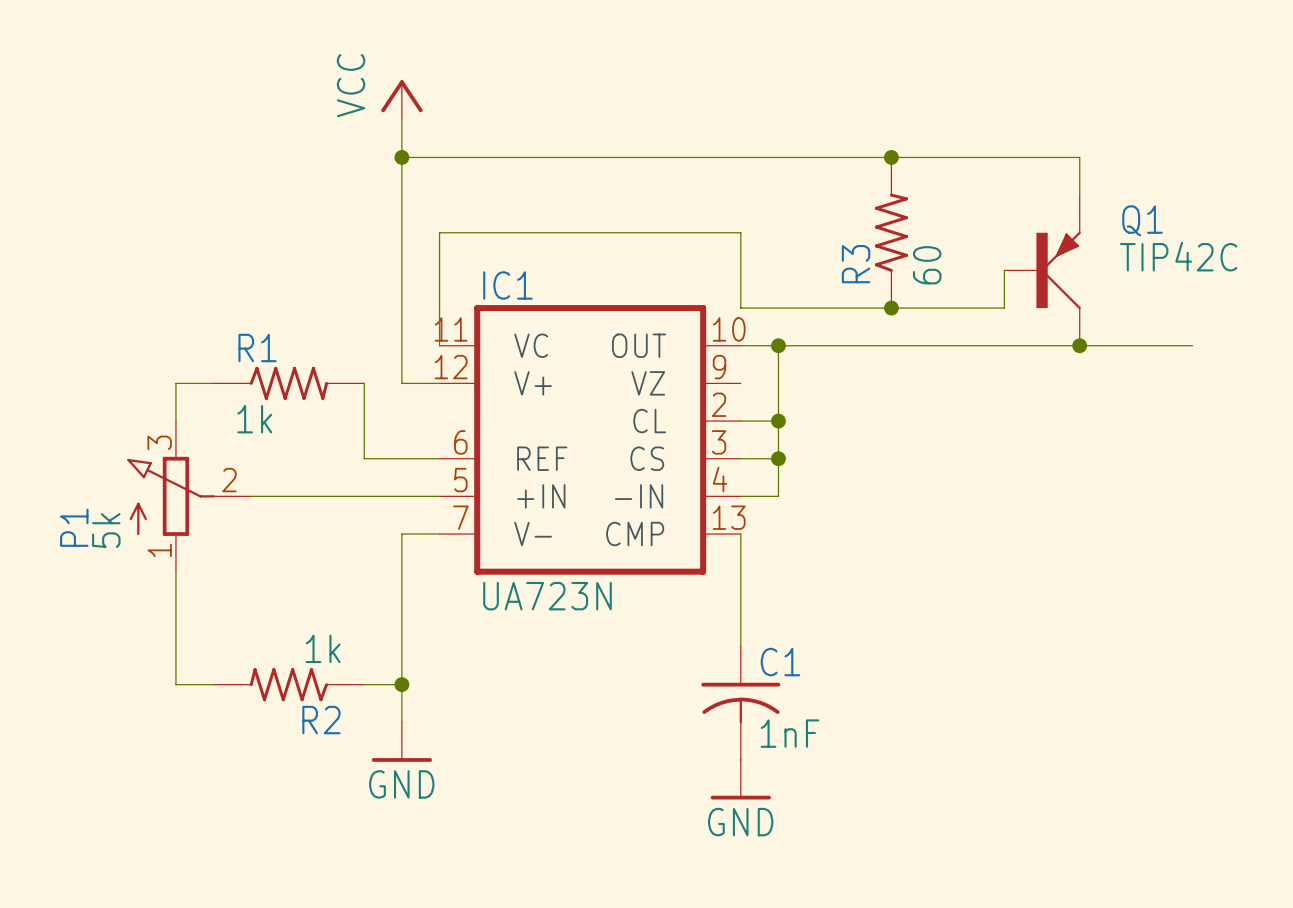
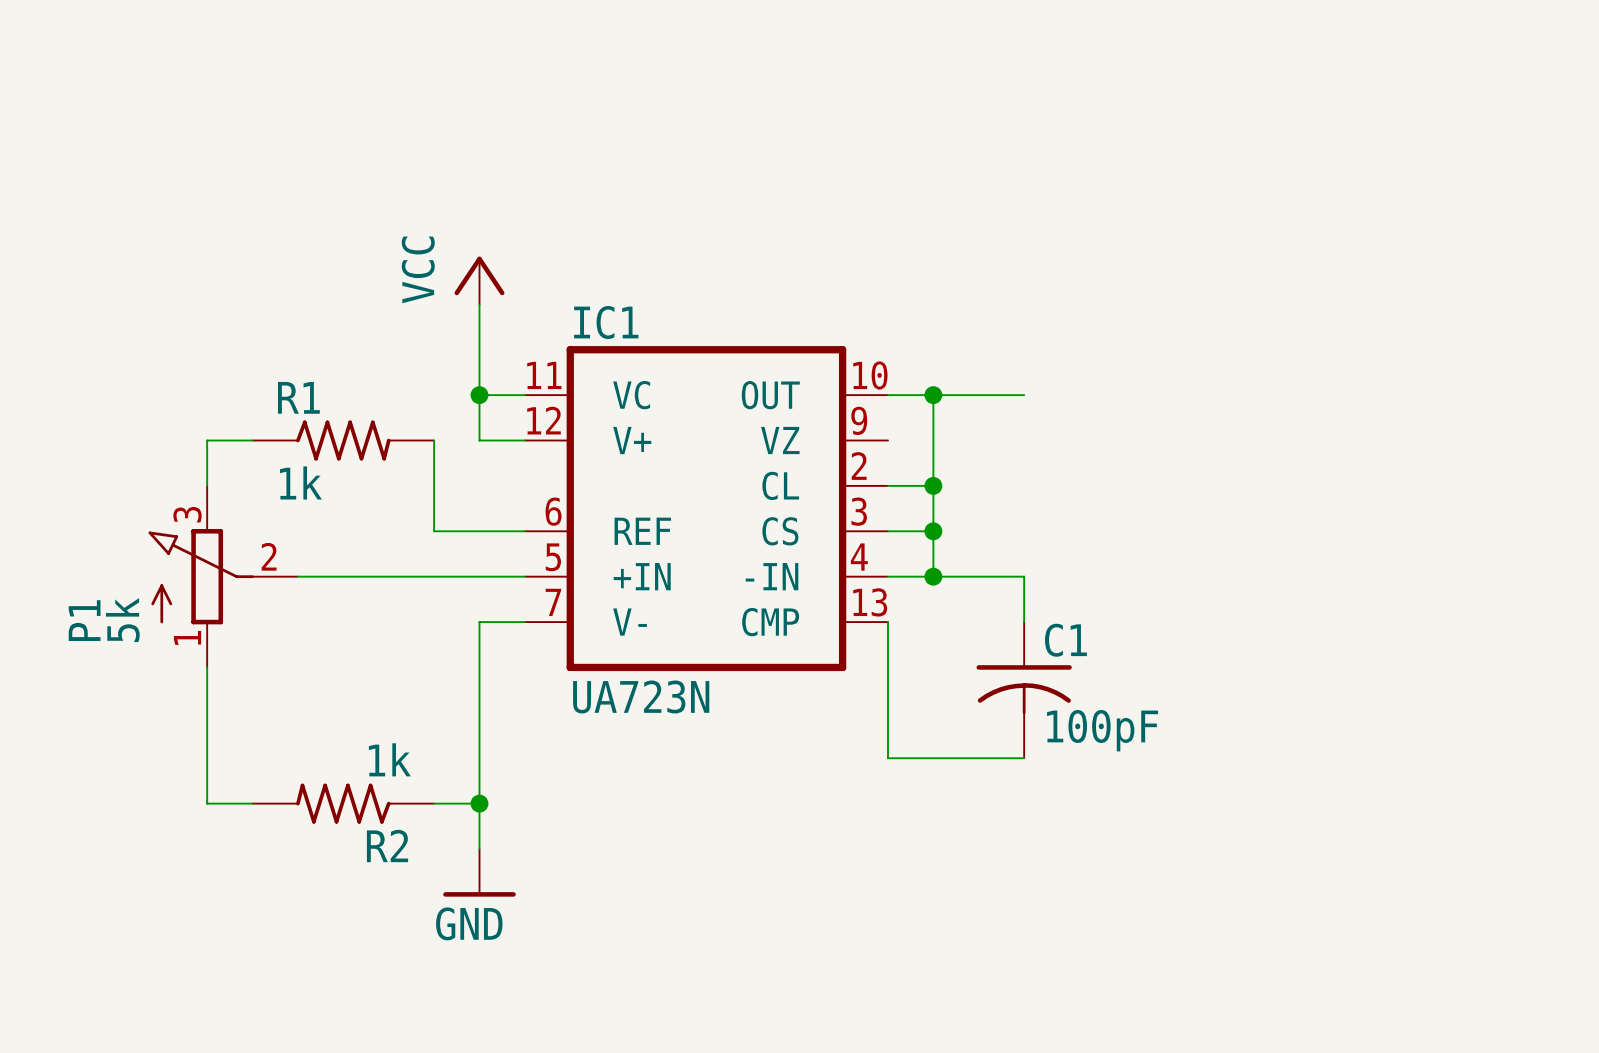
power symbol position: VCC (401, 100) -> VCC (479, 280)
wire: (401, 119) (401, 270) -> none
wire: (401, 157) (1079, 157) (1079, 195) -> none
junction: (401, 157) -> none
junction: (891, 157) -> none
R3: 60 (891, 232) -> none
wire: (1004, 270) (1004, 308) (740, 308) (740, 232) (439, 232) (439, 345) -> (479, 395) (524, 395)
Q1: TIP42C (1042, 270) -> none
junction: (891, 308) -> none
junction: none -> (479, 395)
wire: (853, 345) (1192, 345) -> none
junction: (1079, 345) -> none
wire: none -> (933, 576) (1024, 576) (1024, 622)
junction: none -> (933, 576)
wire: none -> (887, 758) (1024, 758)
C1 position: (740, 703) -> (1024, 690)
C1 value: 1nF (790, 733) -> 100pF (1102, 730)
power symbol: GND (740, 779) -> none

